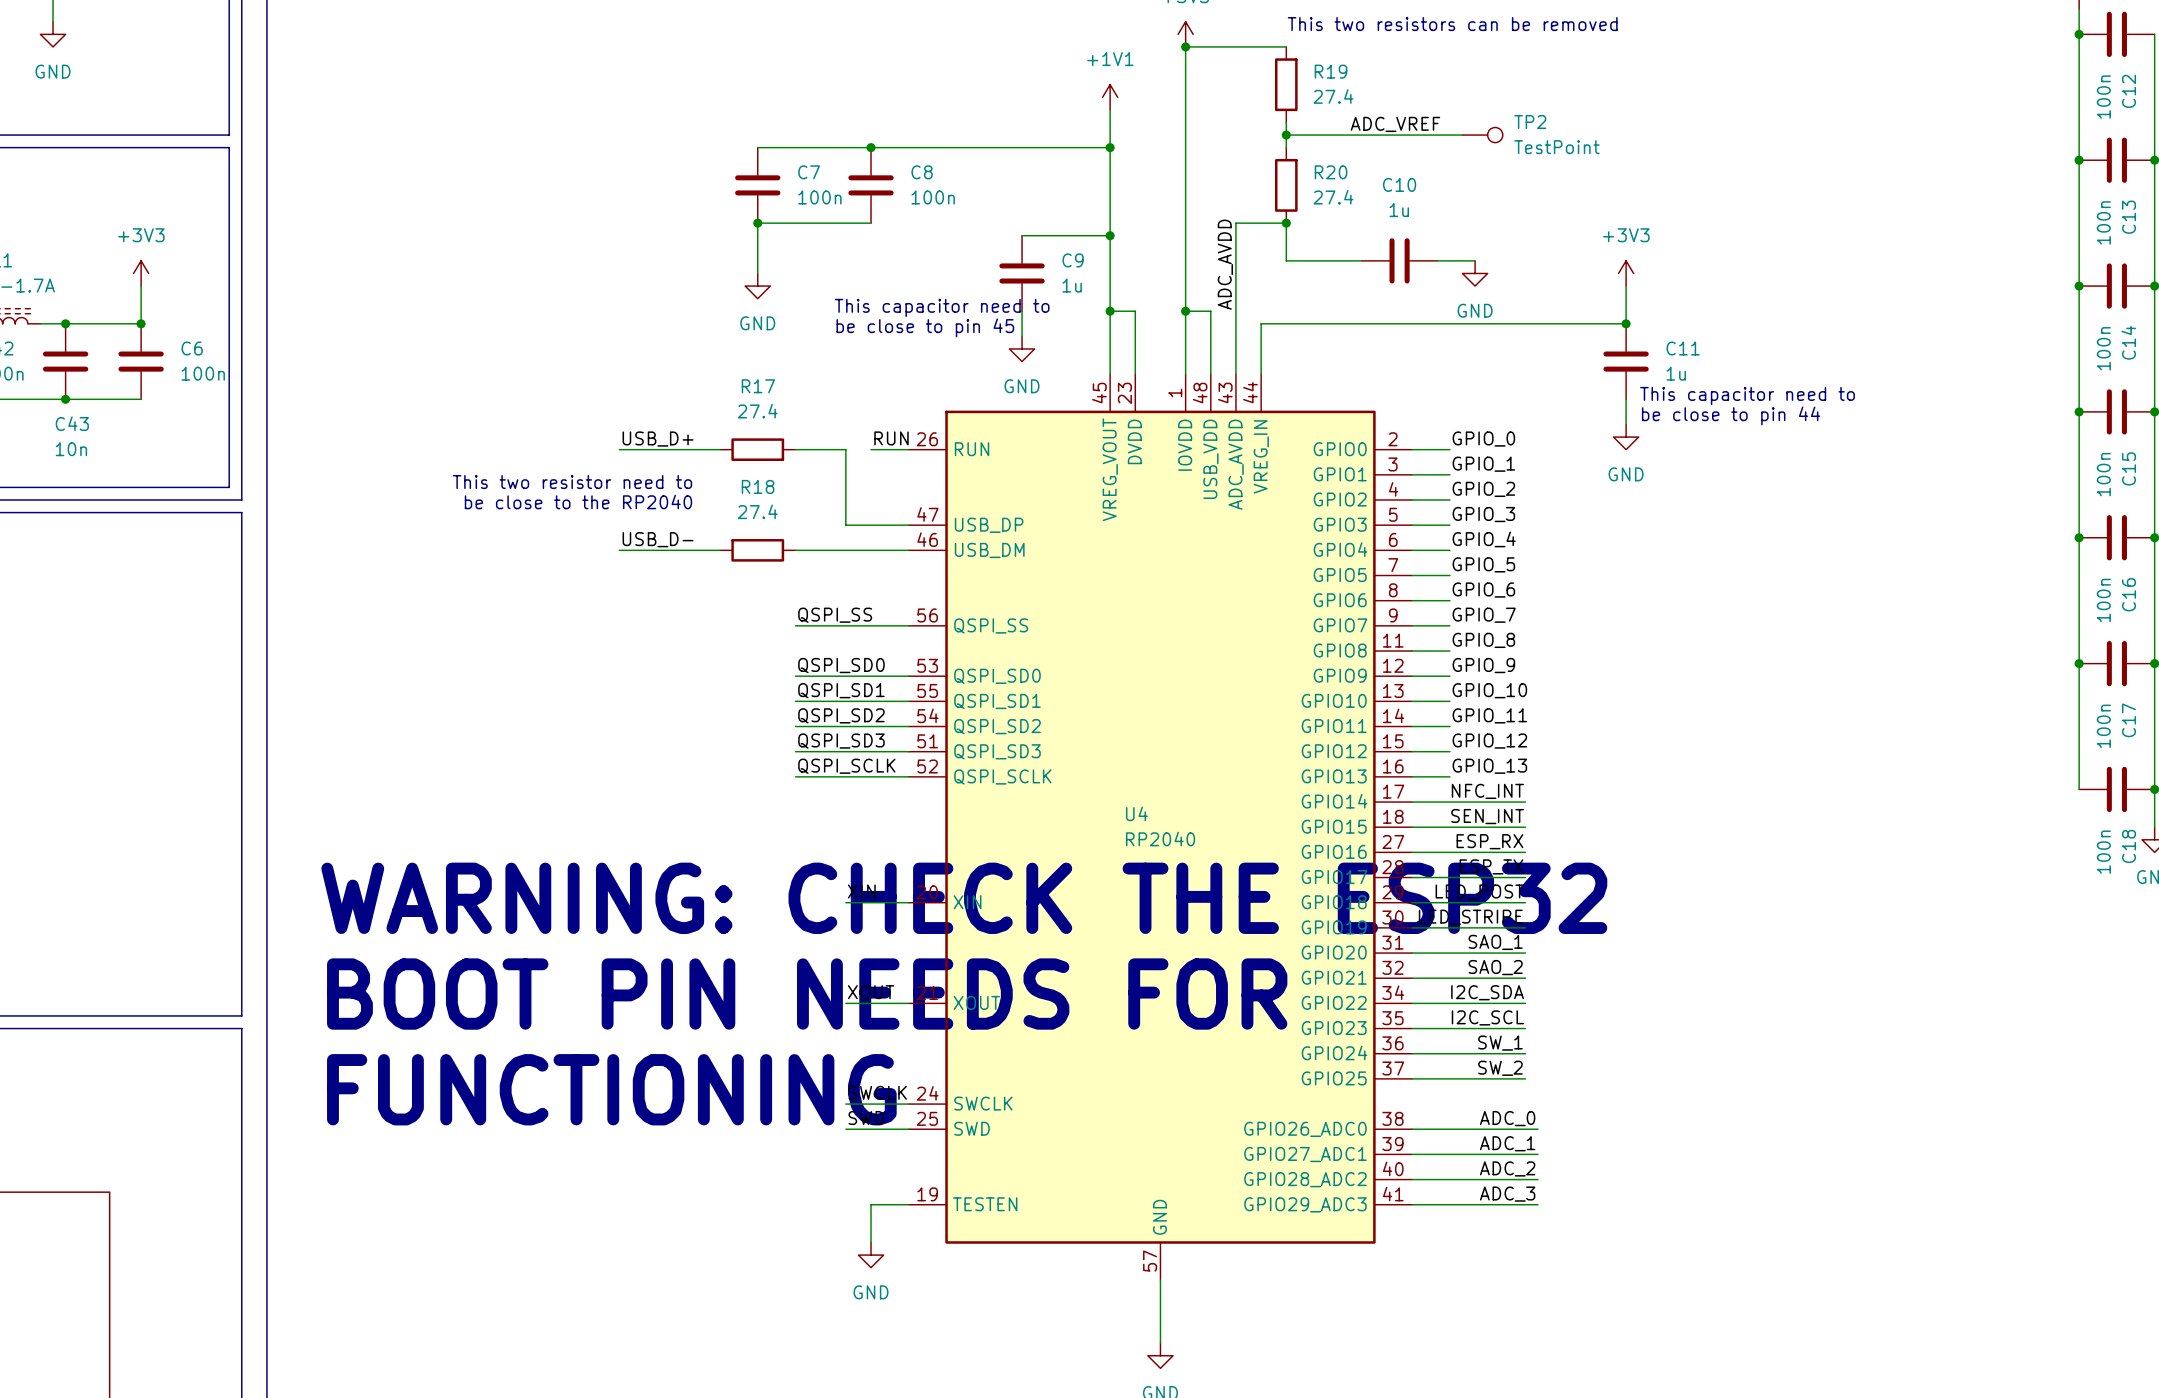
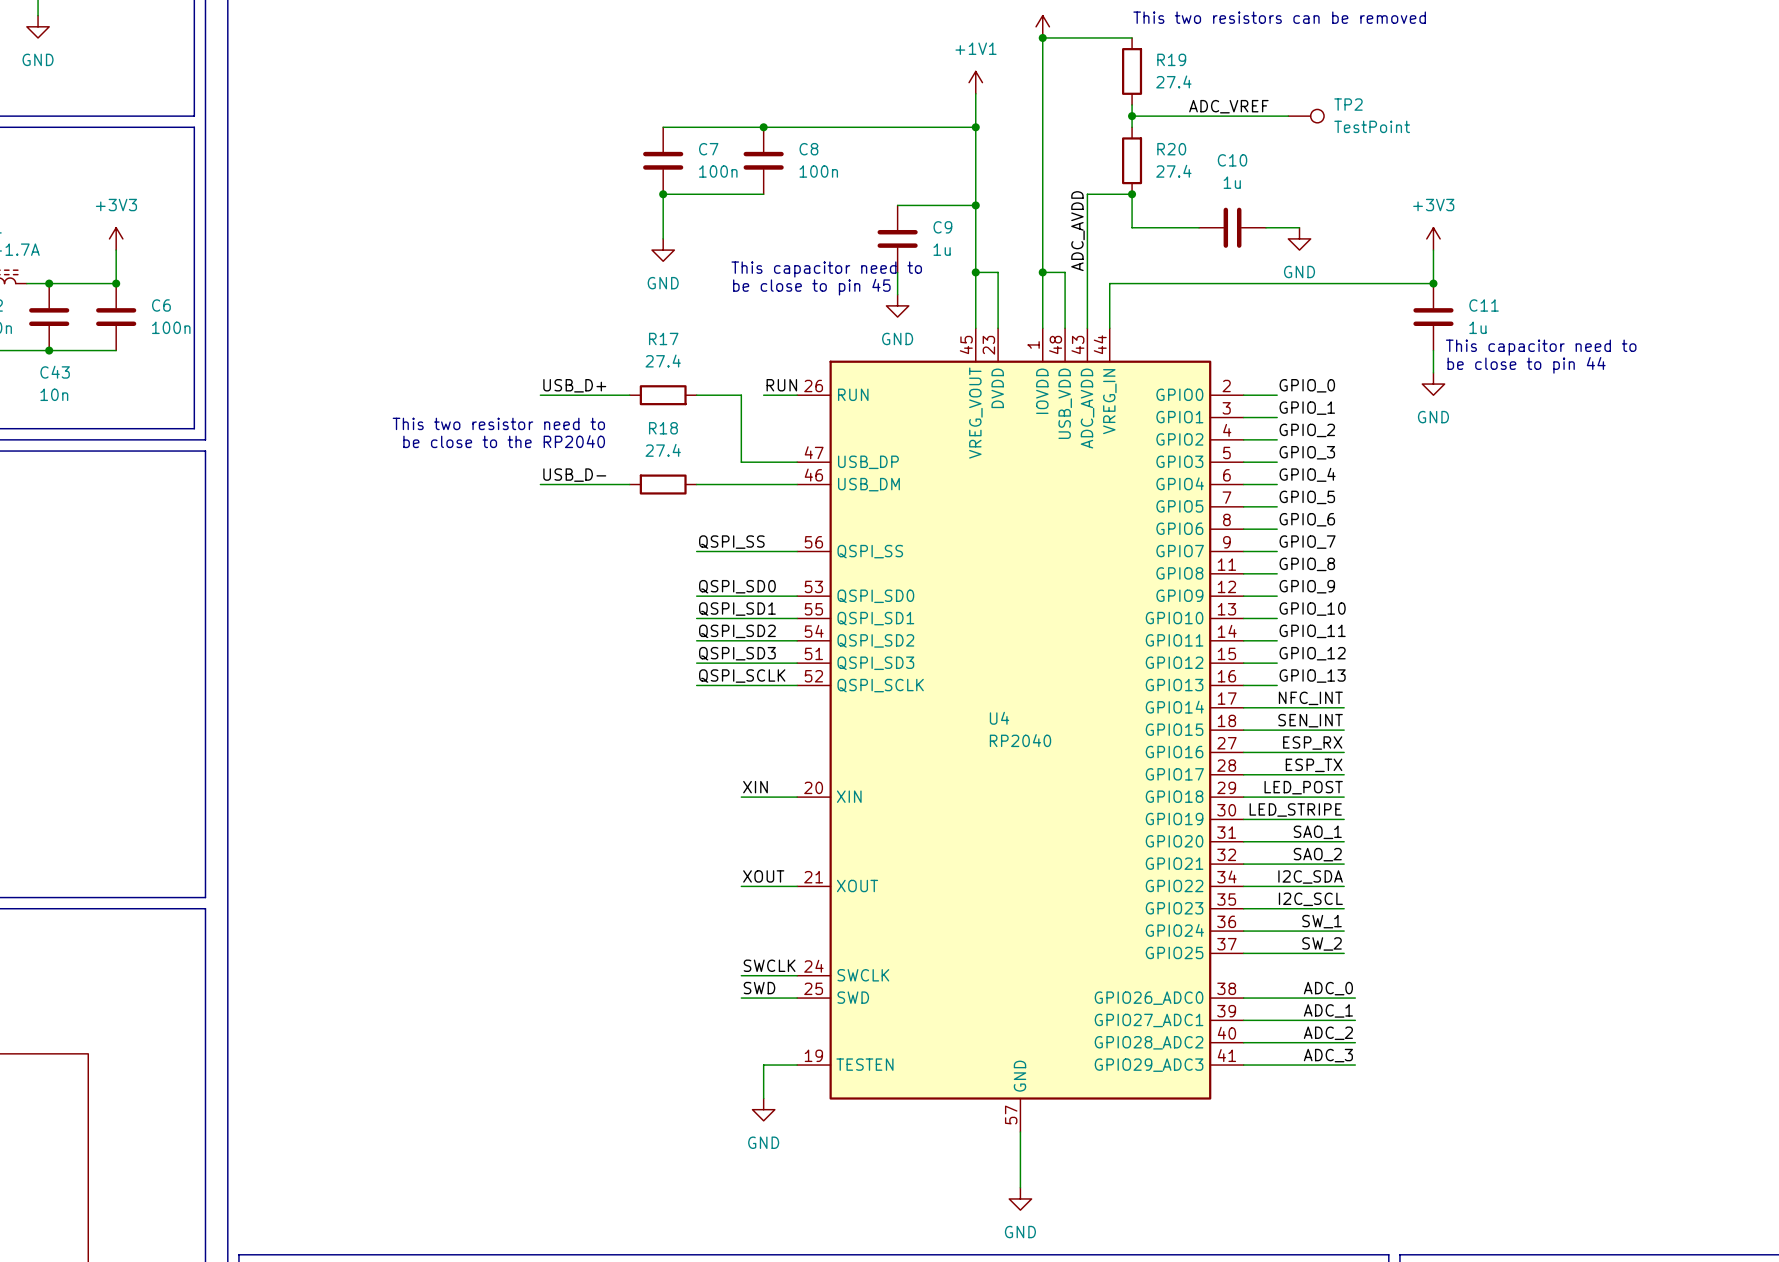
text: WARNING: CHECK THE ESP32 (964, 898) -> none
text: BOOT PIN NEEDS FOR (807, 994) -> none
text: FUNCTIONING (611, 1089) -> none

